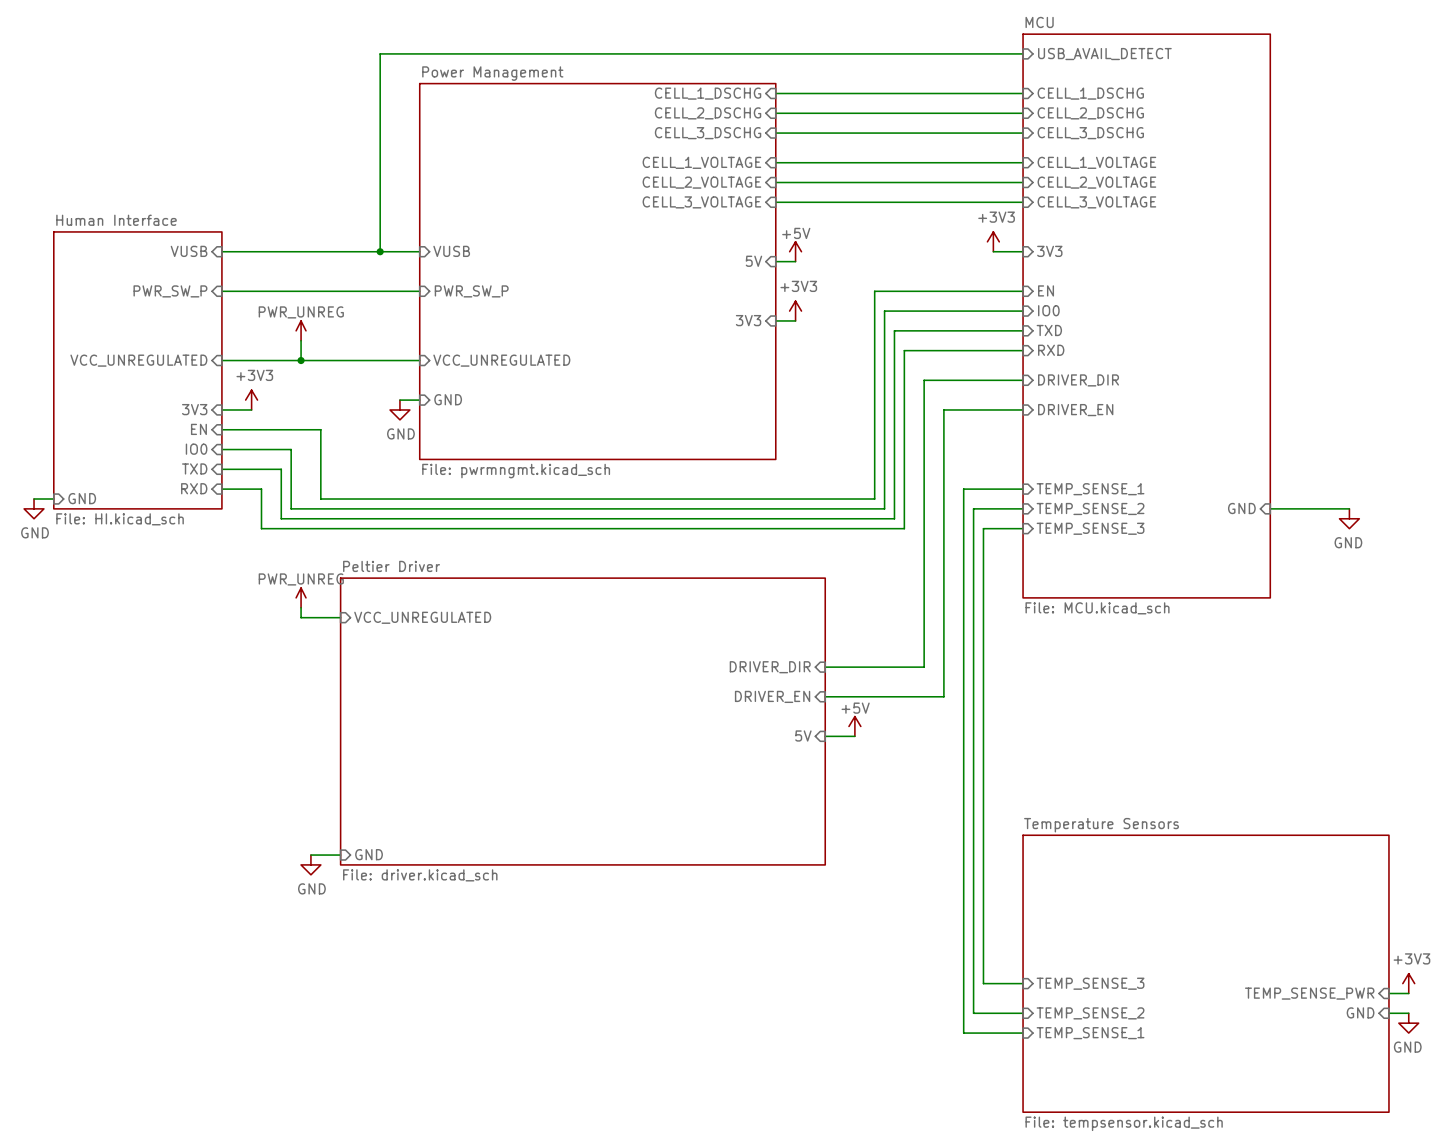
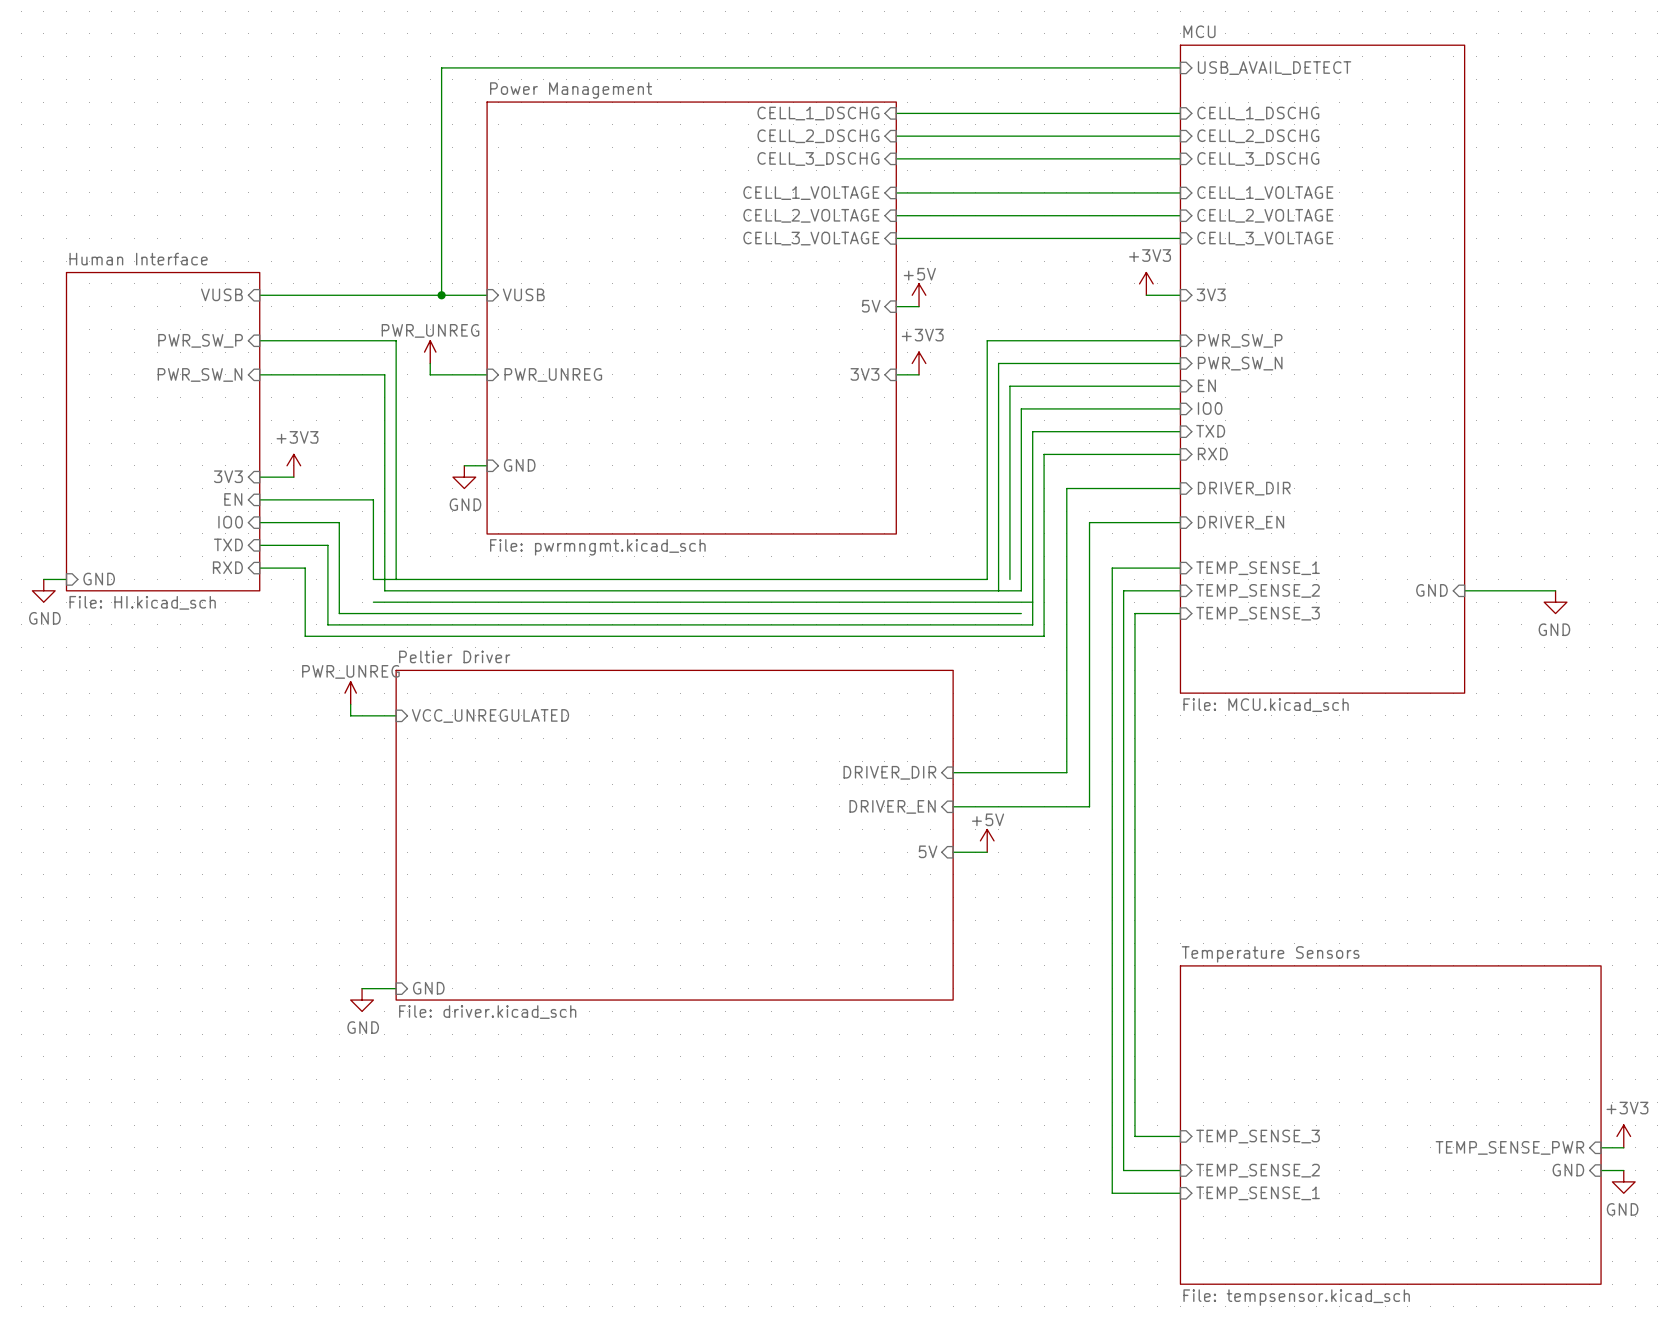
sheet pin: EN (1046, 290) -> PWR_SW_P (1240, 340)
wire: (340, 291) (419, 291) -> (396, 340) (396, 579)
sheet pin: PWR_SW_P (471, 291) -> none
wire: (874, 291) (874, 330) -> (1032, 386) (1009, 386)
sheet pin: IO0 (1048, 310) -> PWR_SW_N (1240, 363)
wire: none -> (430, 363) (430, 374) (487, 374)
wire: (884, 311) (884, 350) -> (1044, 408) (1021, 408)
wire: none -> (1021, 363) (998, 363) (998, 590)
sheet pin: none -> PWR_SW_N (200, 374)
sheet pin: none -> PWR_UNREG (553, 374)
power symbol position: PWR_UNREG (301, 330) -> PWR_UNREG (430, 352)
wire: (894, 330) (894, 370) -> (1180, 431) (1032, 431)
sheet pin: TXD (1049, 330) -> EN (1206, 385)
wire: (301, 340) (301, 360) -> none
wire: (904, 350) (904, 390) -> (1180, 454) (1044, 454)
sheet pin: RXD (1051, 350) -> IO0 (1210, 408)
sheet pin: VCC_UNREGULATED (138, 360) -> none
wire: (221, 360) (419, 360) -> none
junction: (301, 360) -> none
sheet pin: VCC_UNREGULATED (501, 360) -> none
sheet pin: none -> TXD (1210, 431)
wire: (1023, 380) (924, 380) (924, 419) -> (1180, 488) (1066, 488)
sheet pin position: DRIVER_DIR (1078, 380) -> DRIVER_DIR (1244, 488)
sheet pin: none -> RXD (1212, 453)
wire: (1023, 409) (943, 409) (943, 449) -> (1180, 522) (1089, 522)
sheet pin position: DRIVER_EN (1075, 410) -> DRIVER_EN (1240, 522)
wire: (854, 498) (874, 498) -> (987, 579) (987, 340) (1009, 340)
wire: (291, 508) (330, 508) -> (259, 374) (384, 374) (384, 590)
wire: (281, 518) (320, 518) -> (327, 602) (327, 624) (1032, 624) (1032, 602)
wire: (261, 528) (291, 528) -> (339, 590) (339, 613)
wire: (884, 528) (904, 528) -> (305, 613) (305, 636) (1044, 636) (1044, 613)

